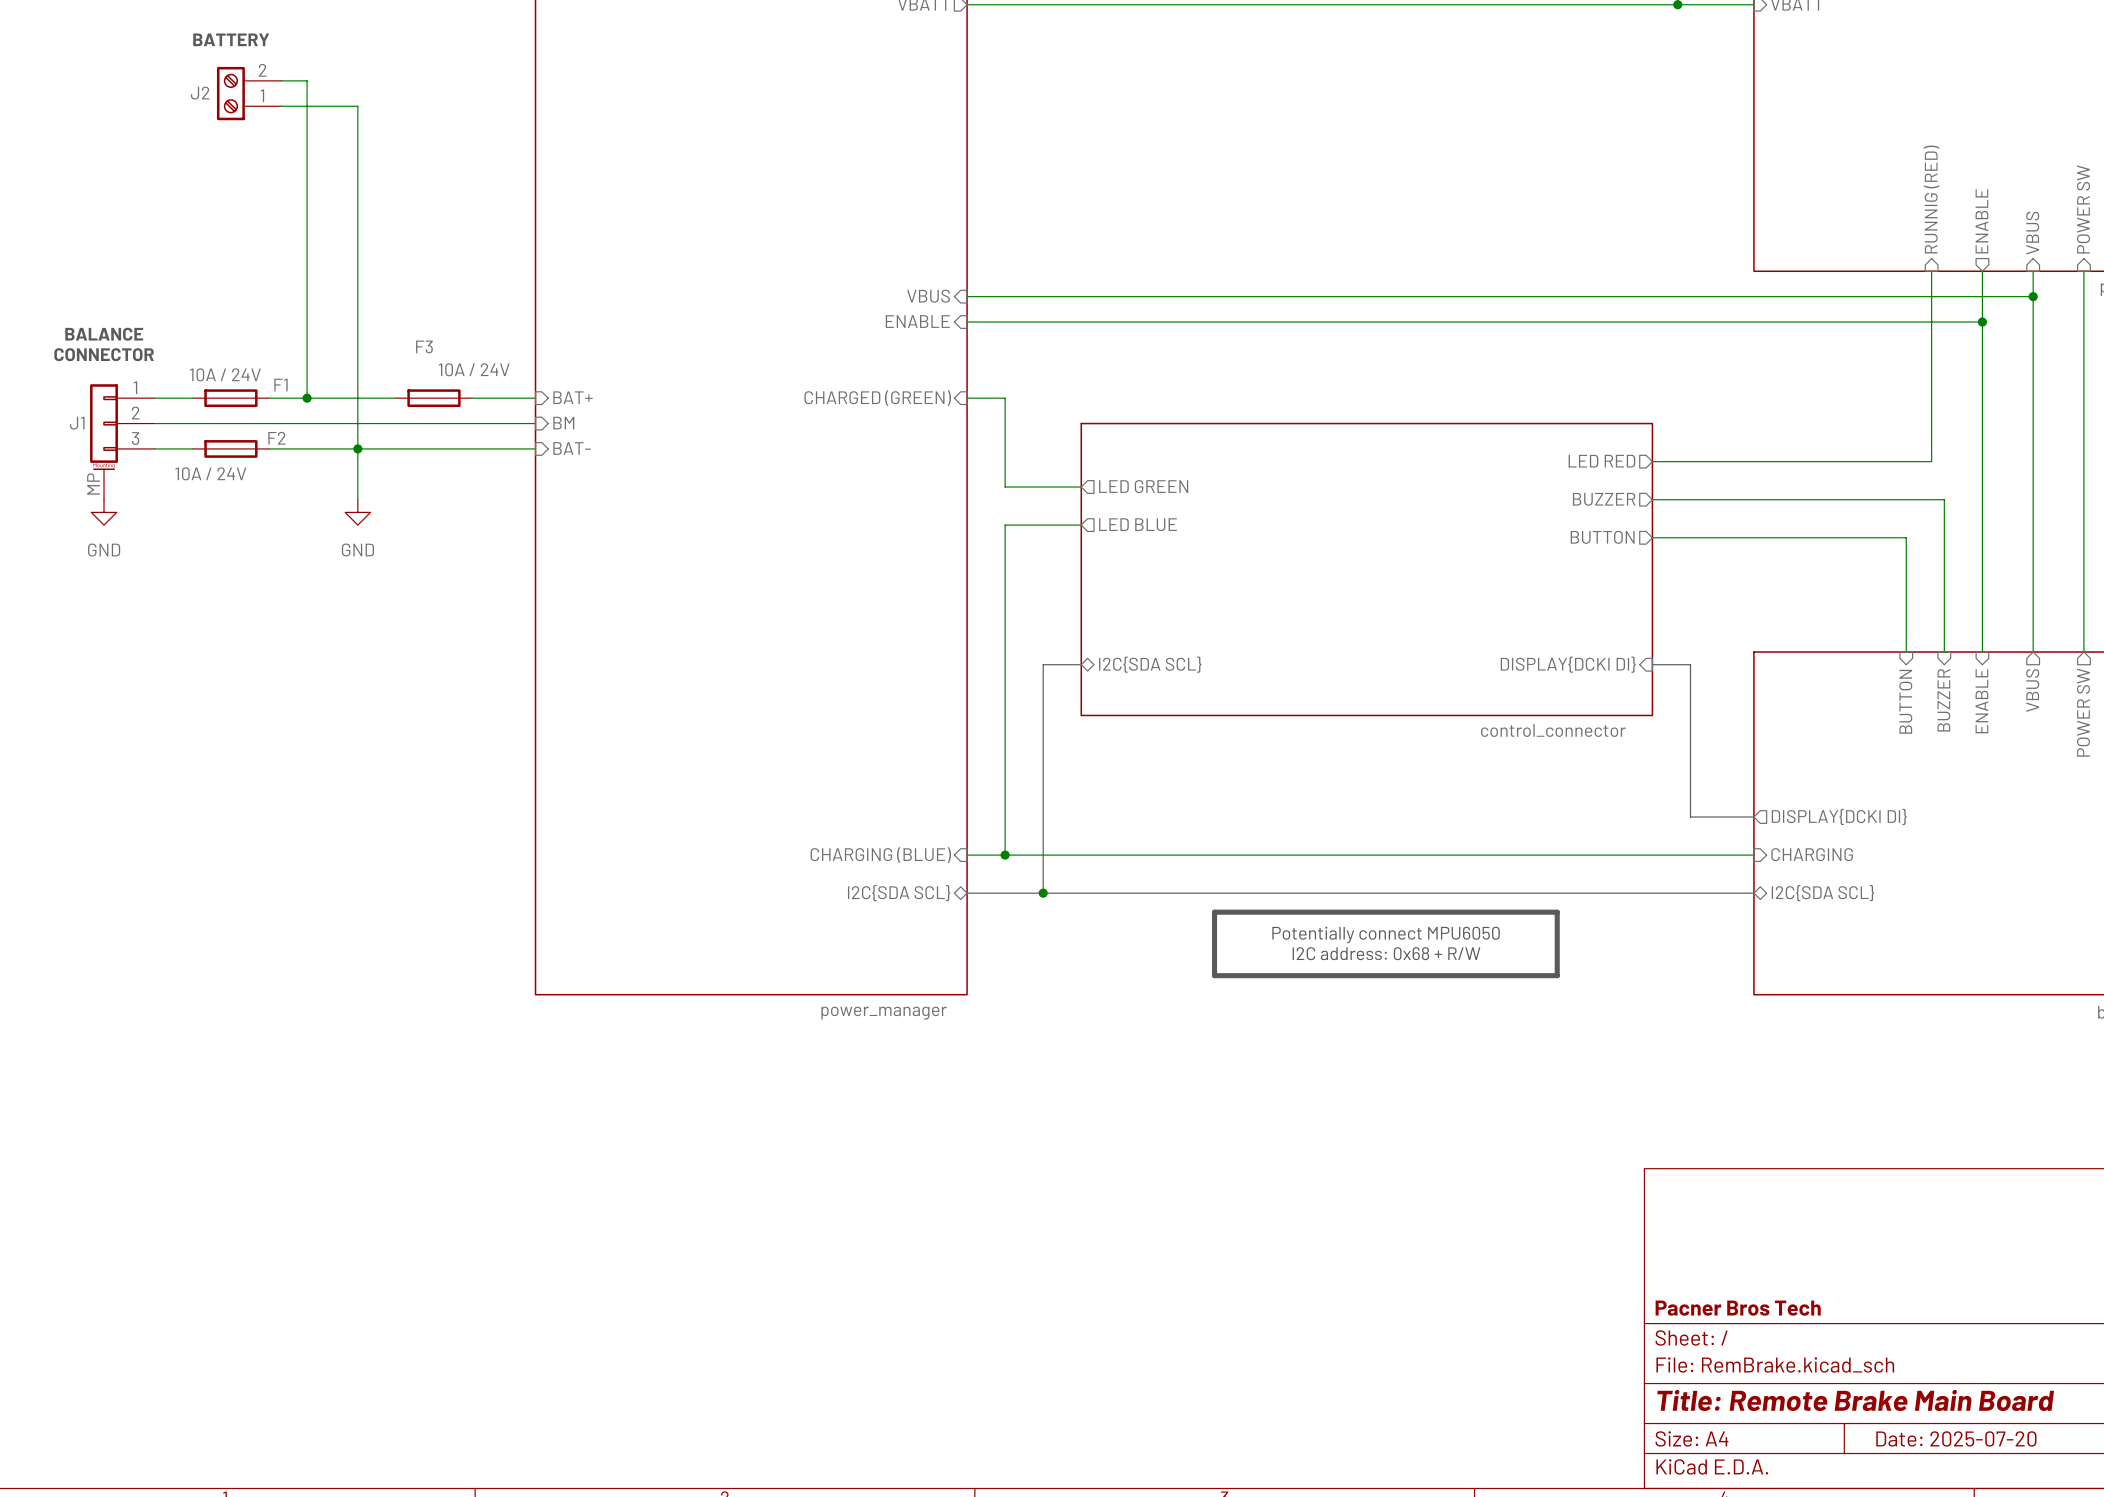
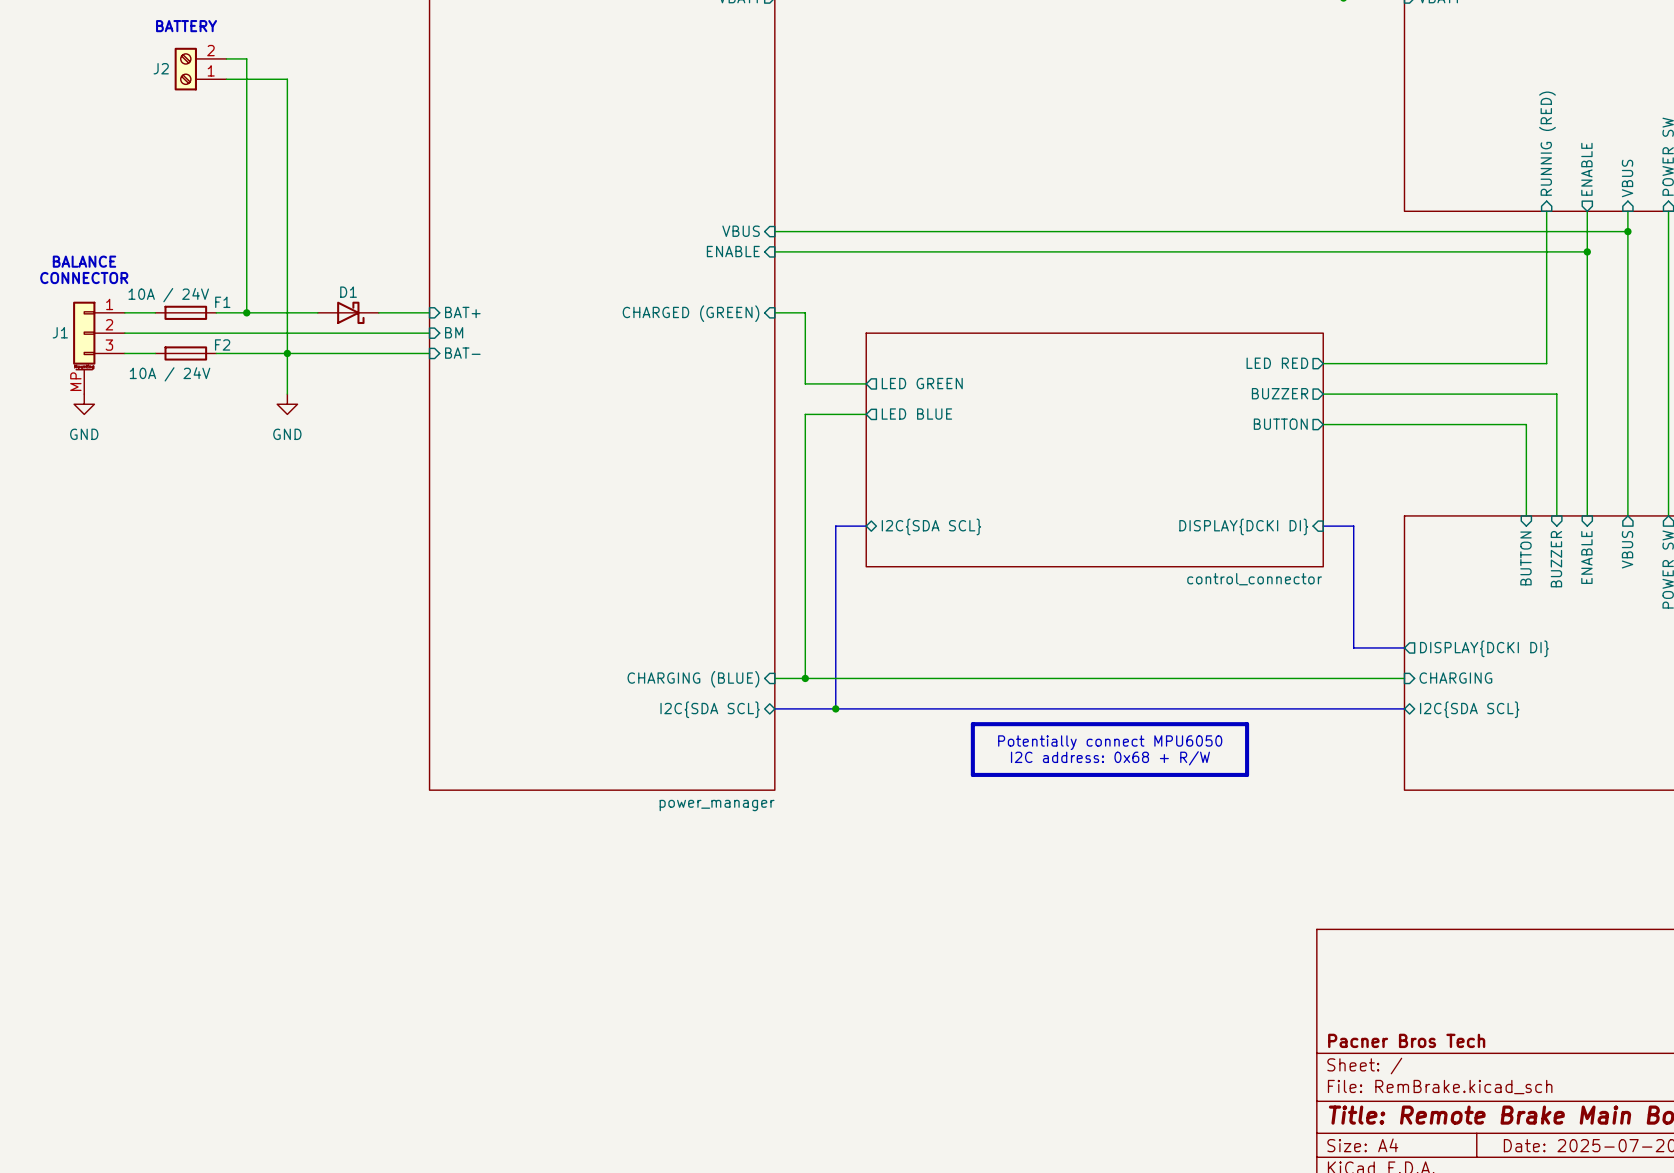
F3: 10A / 24V (433, 398) -> none
D1: none -> (348, 312)

